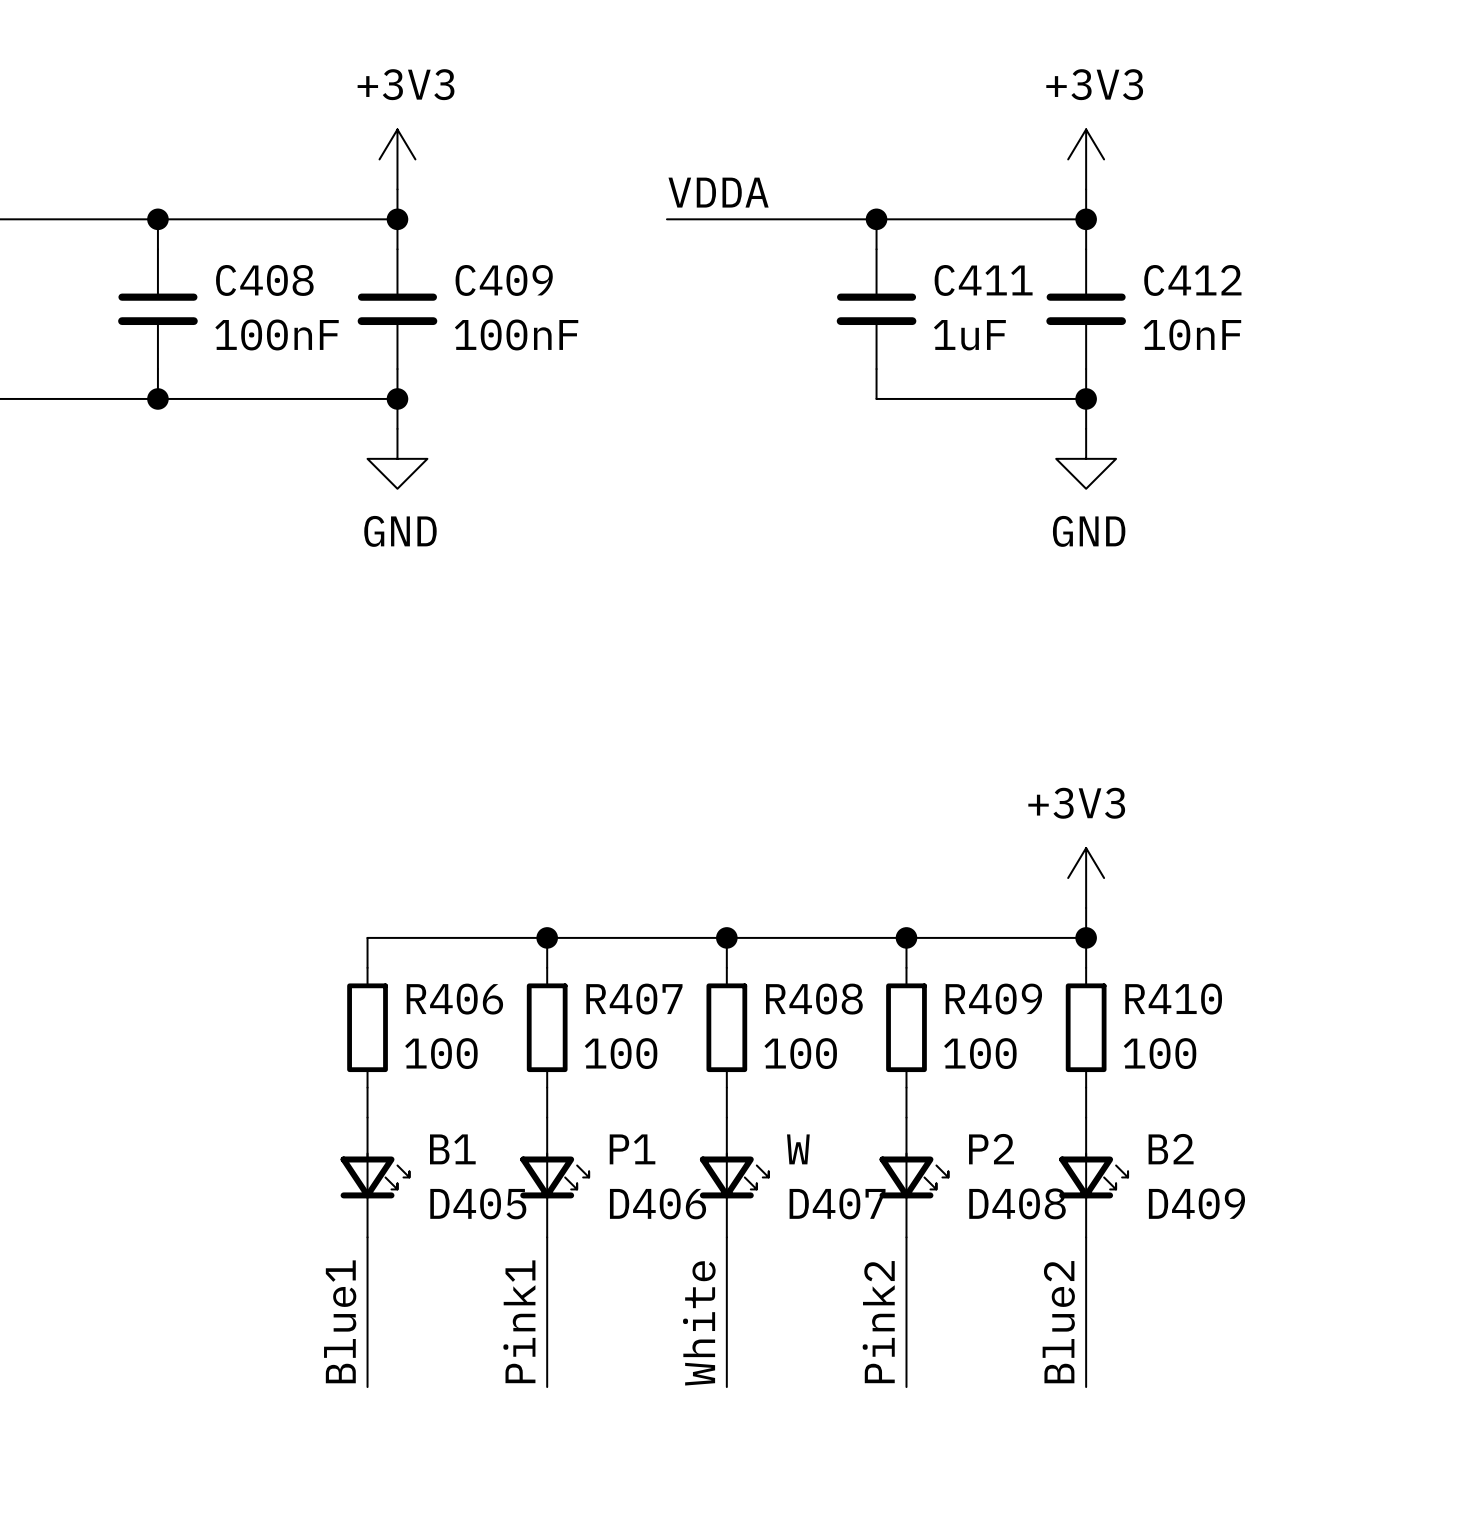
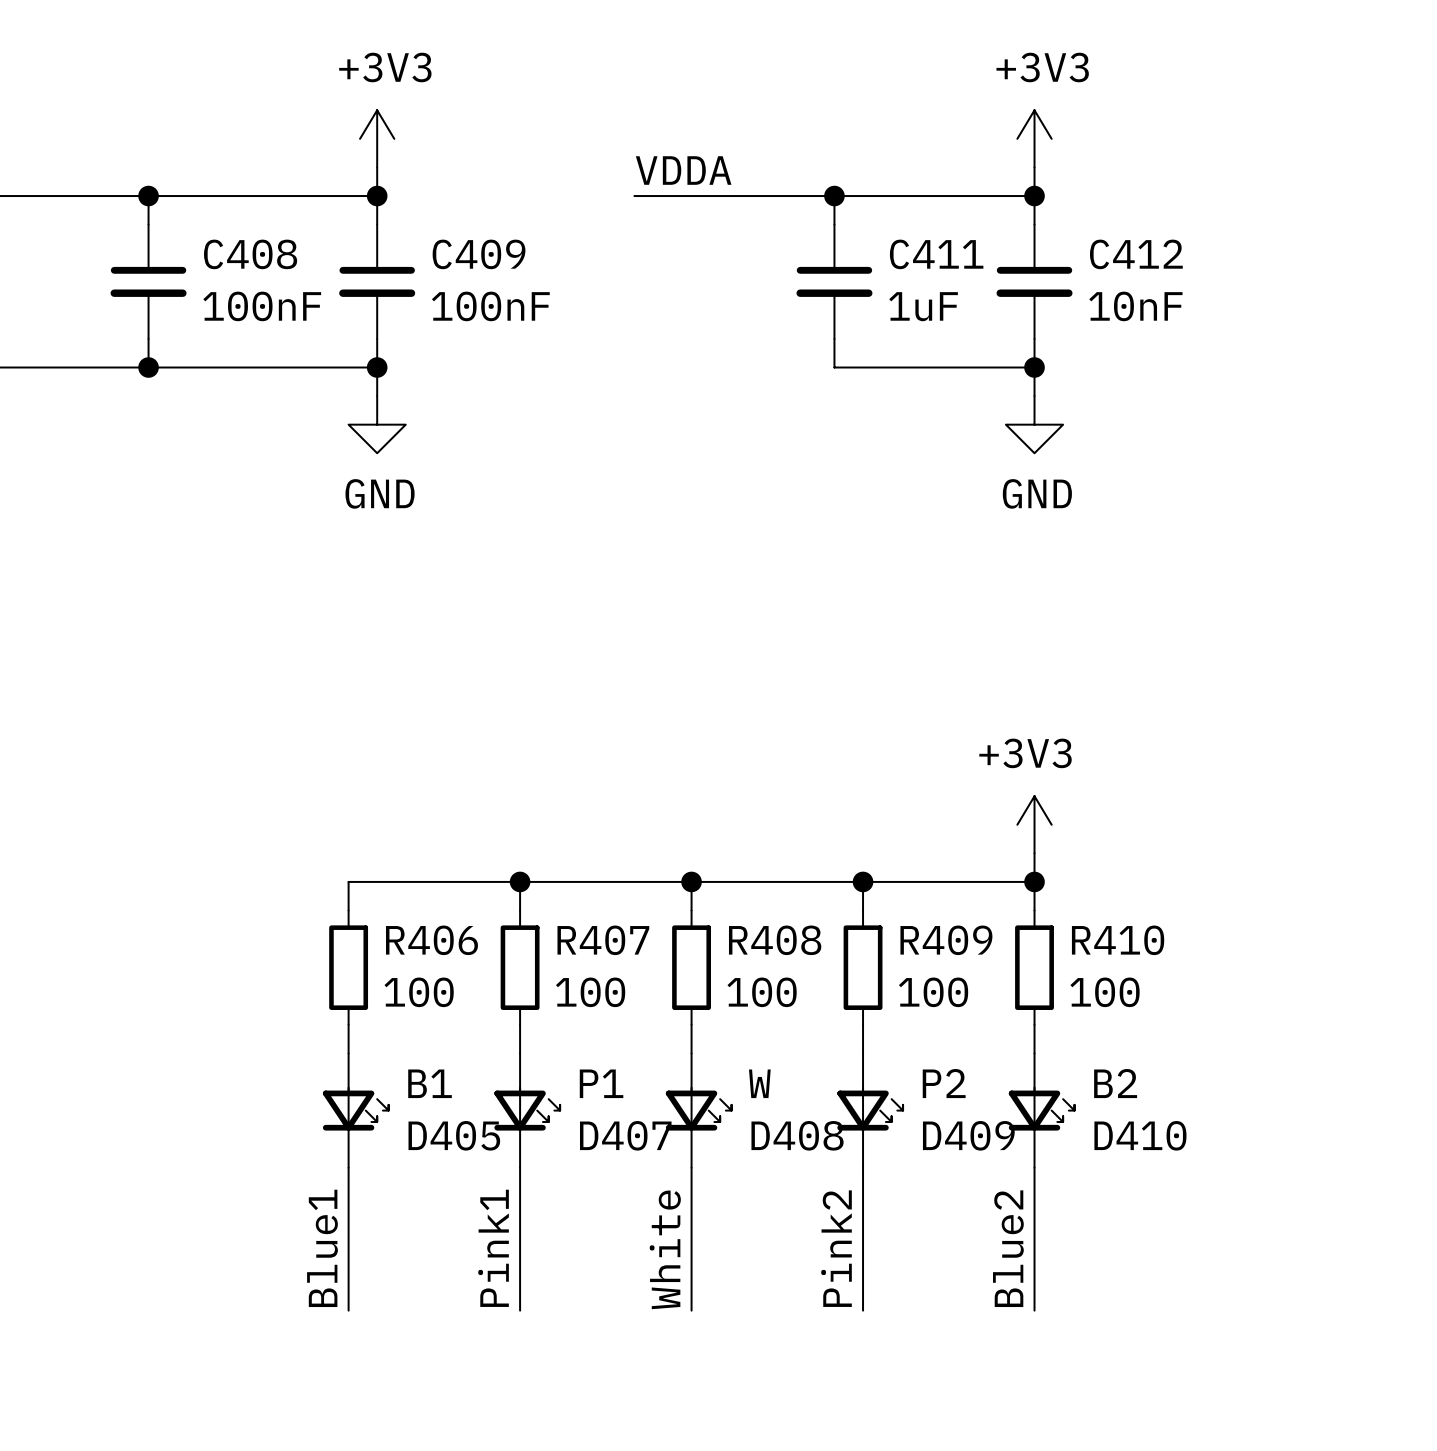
D406 name: D406 (658, 1203) -> D407 (625, 1135)
D407 name: D407 (837, 1203) -> D408 (797, 1135)
D408 name: D408 (1017, 1203) -> D409 (968, 1135)
D409 name: D409 (1196, 1203) -> D410 (1140, 1135)

